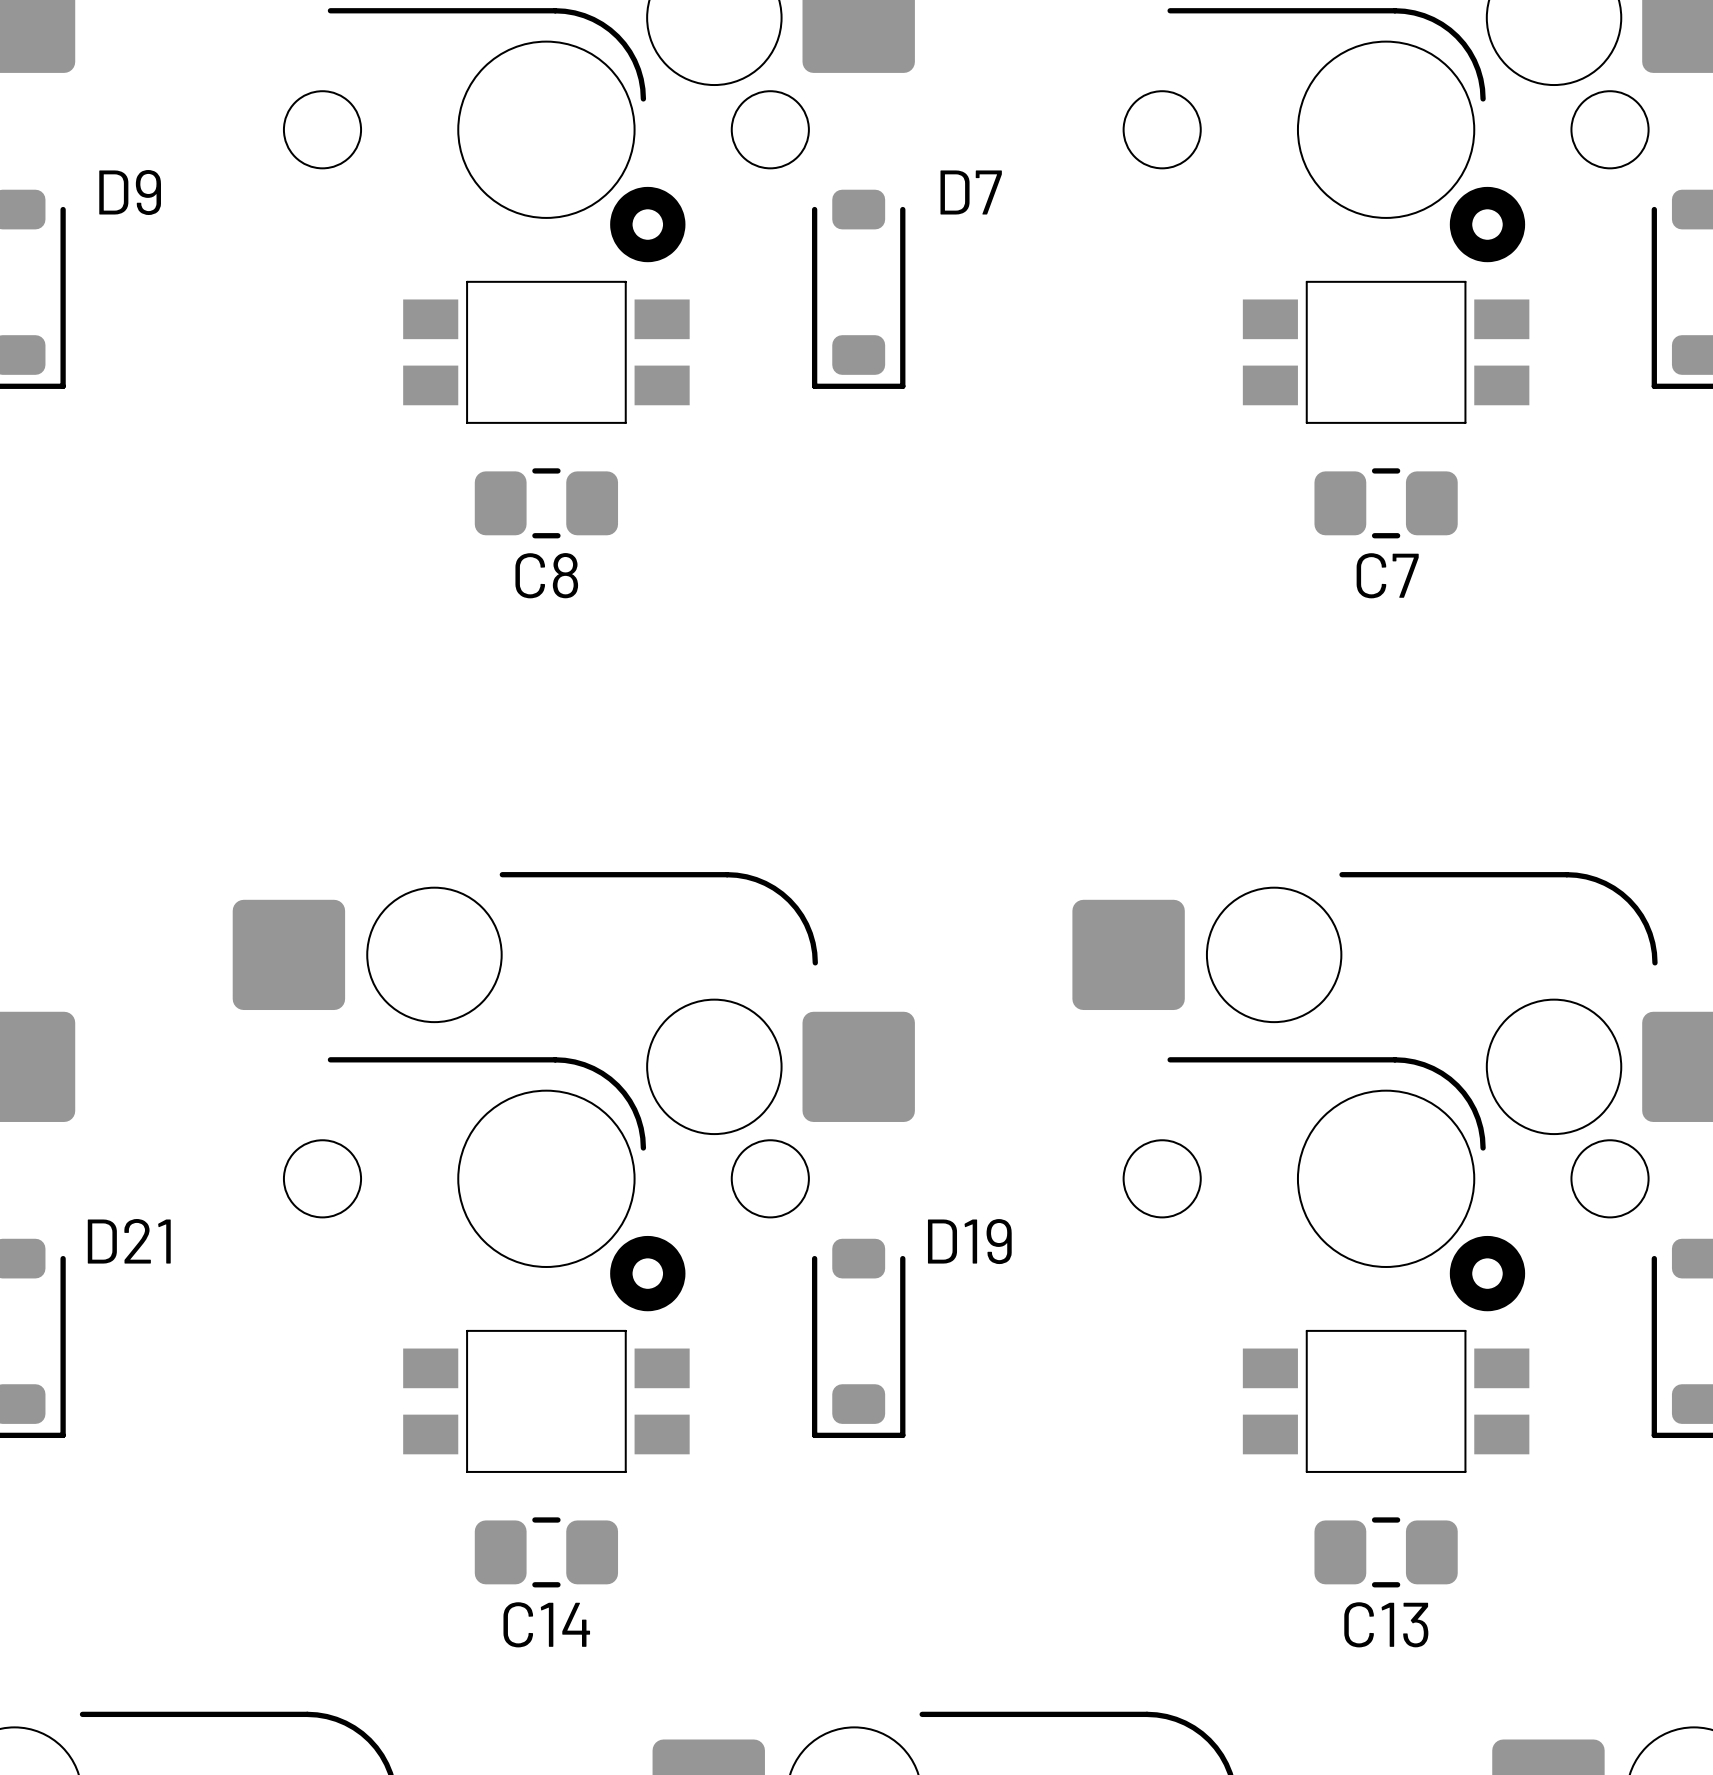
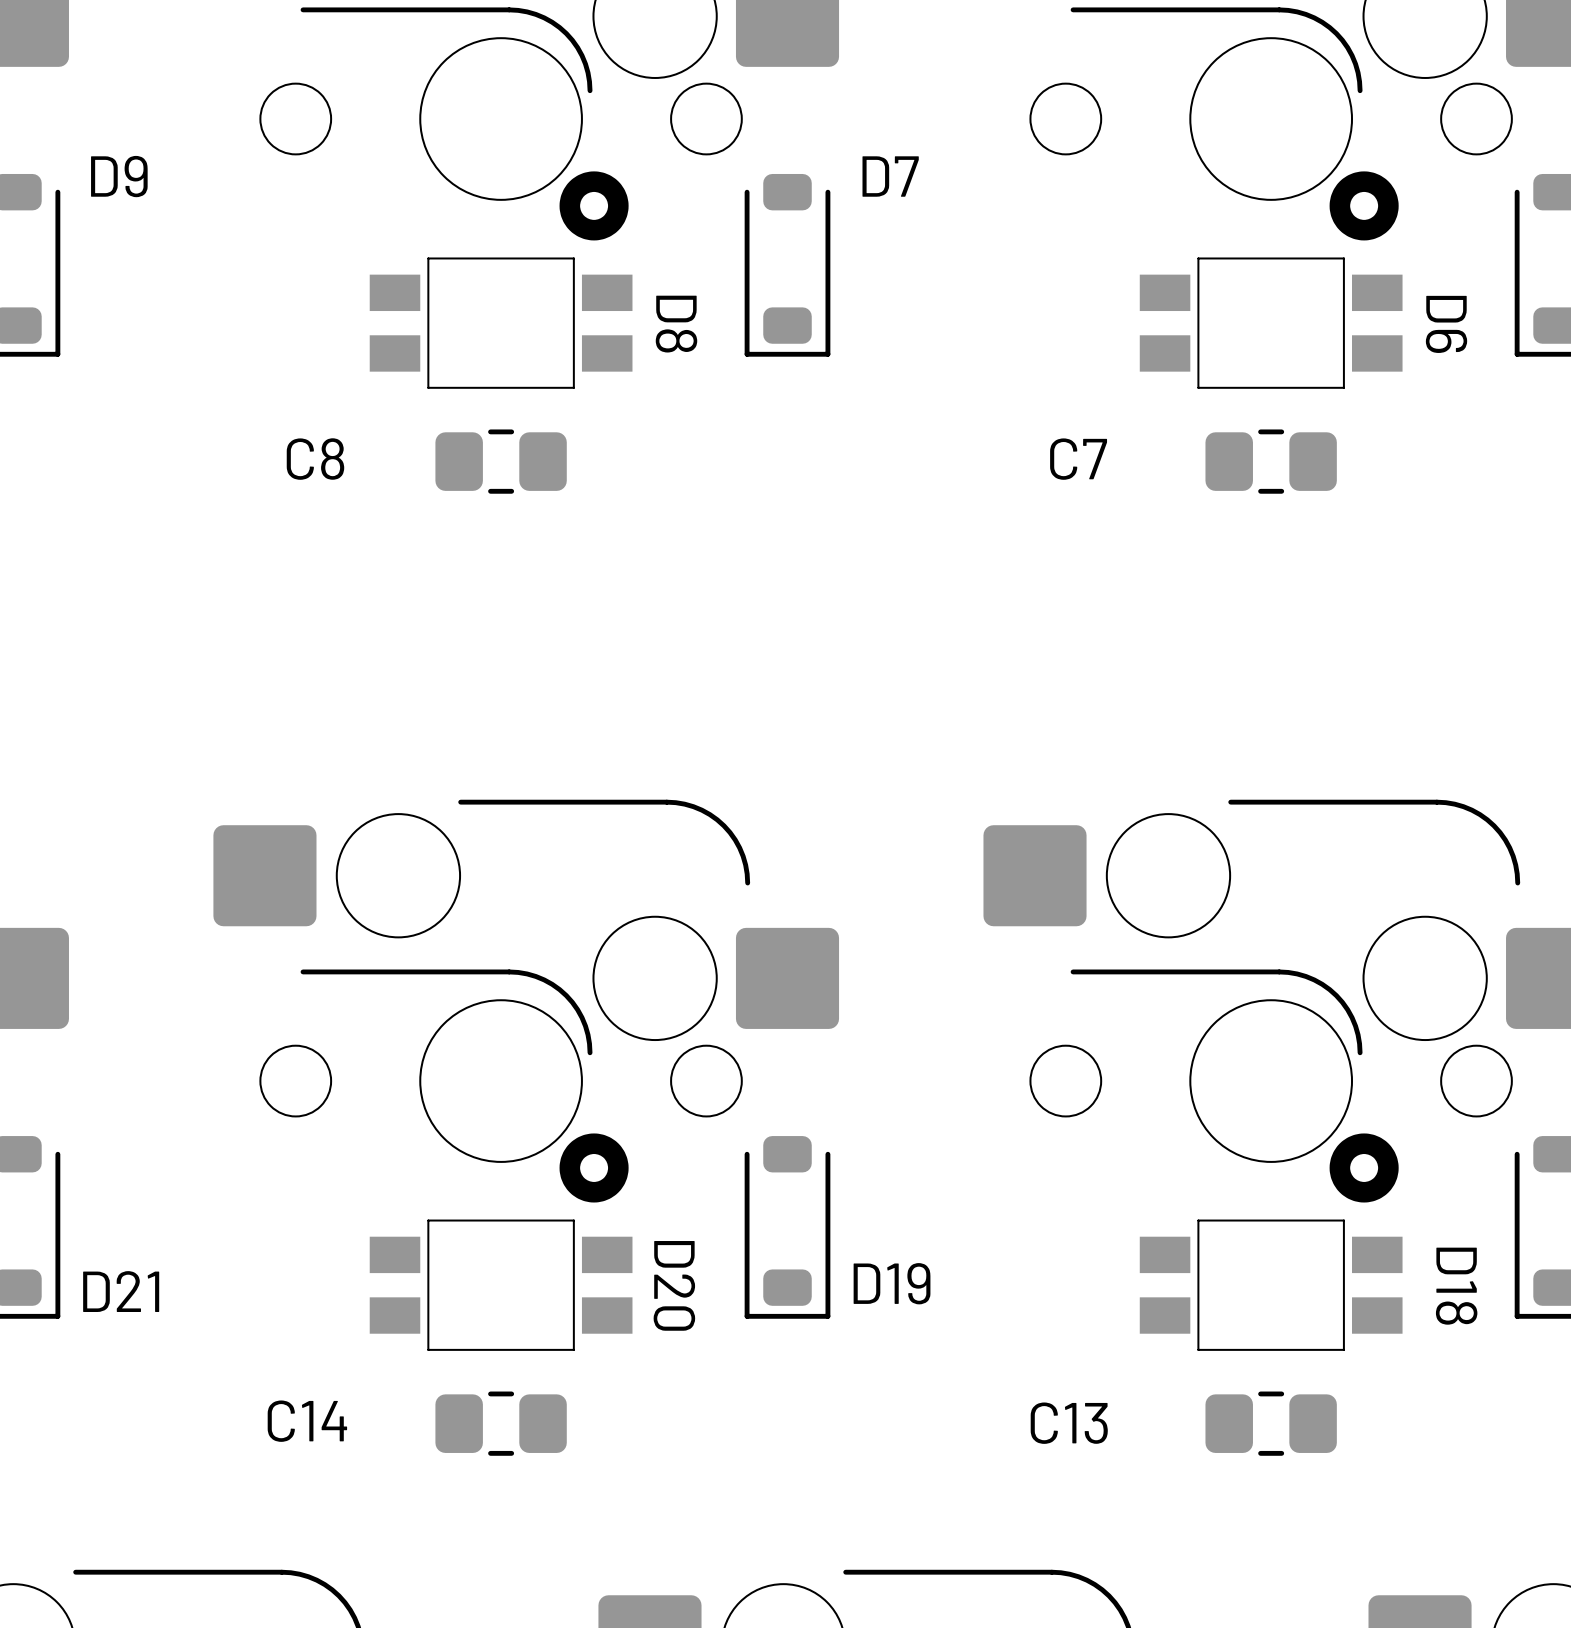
D8 name: none -> D8 (676, 324)
D6 name: none -> D6 (1446, 324)
C8 name position: C8 (546, 575) -> C8 (315, 459)
C7 name position: C7 (1387, 575) -> C7 (1078, 459)
D21 name position: D21 (129, 1241) -> D21 (121, 1291)
D19 name position: D19 (969, 1241) -> D19 (892, 1283)
D20 name: none -> D20 (674, 1285)
D18 name: none -> D18 (1456, 1286)
C14 name position: C14 (546, 1624) -> C14 (307, 1421)
C13 name position: C13 (1386, 1624) -> C13 (1069, 1423)

